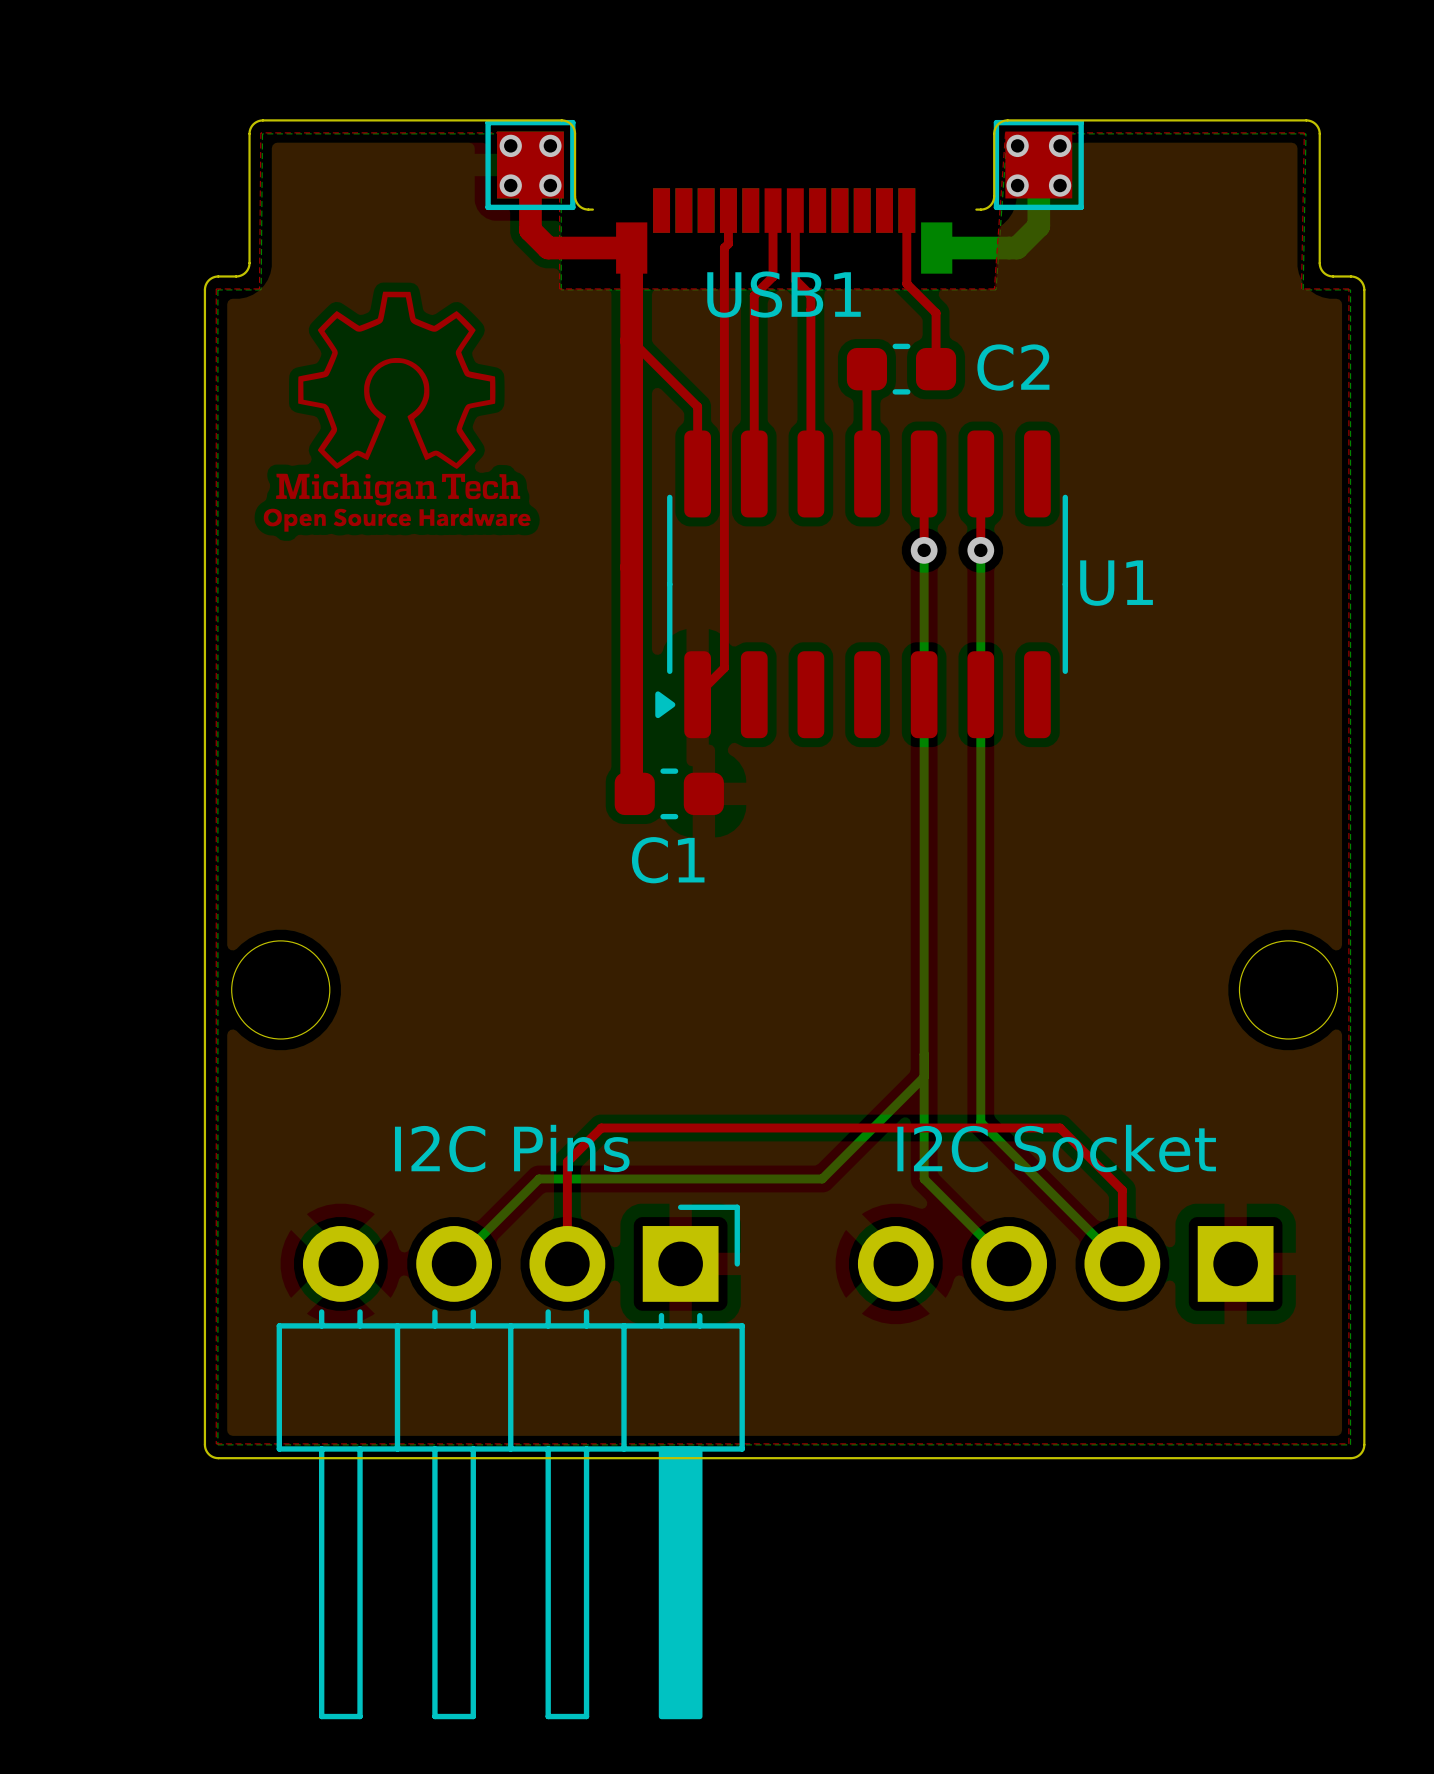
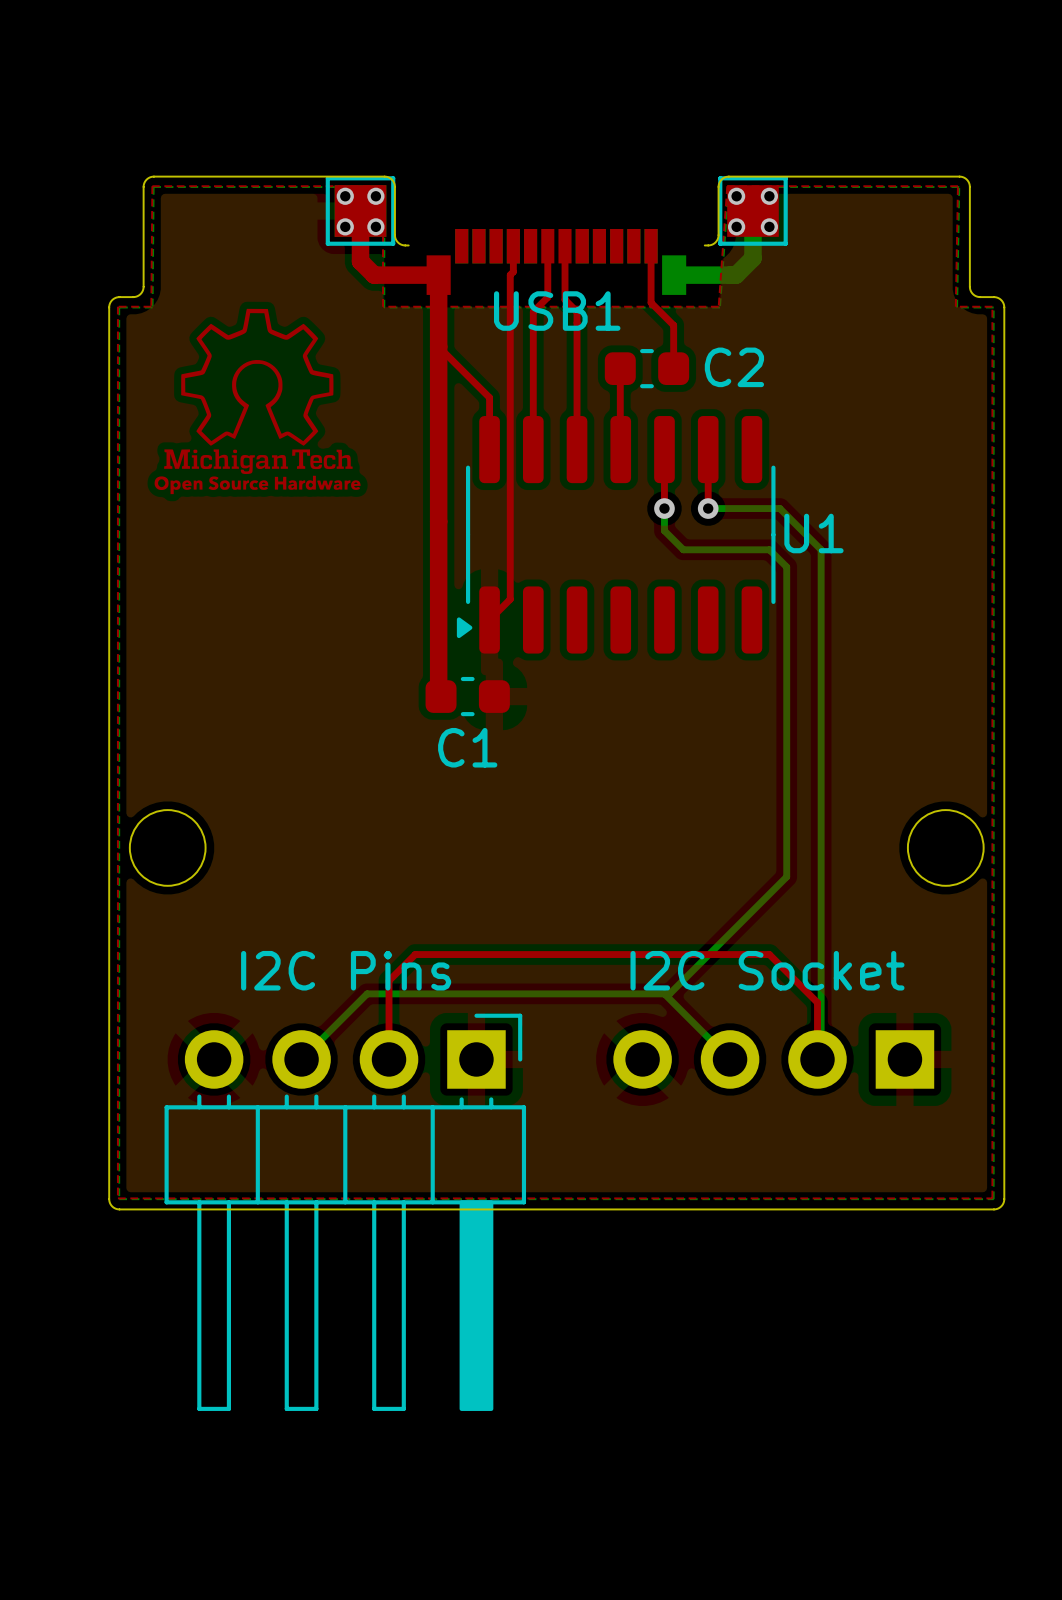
bottom track: (980, 550) (980, 1122) (1122, 1263) -> (708, 508) (779, 508) (821, 549) (821, 1055) (817, 1059)
bottom track: (924, 579) (924, 1178) -> (664, 530) (683, 549) (769, 549) (786, 567) (786, 876) (669, 993) (585, 993)
bottom track: (924, 1077) (822, 1178) -> none

